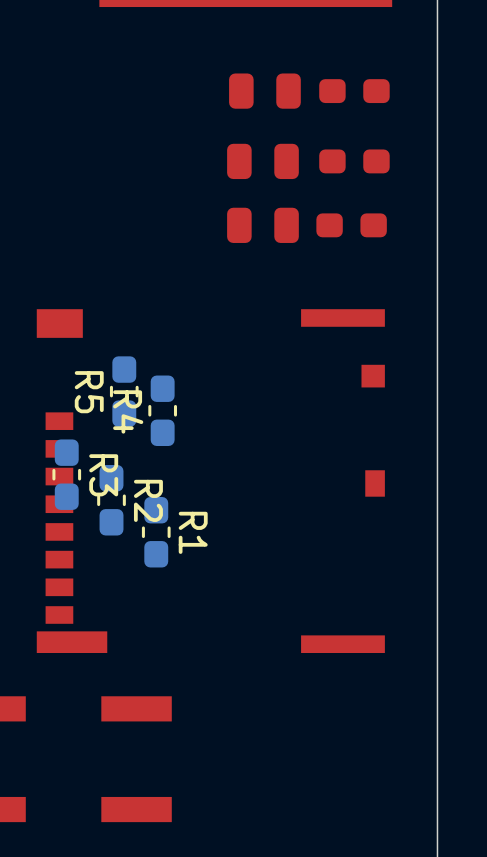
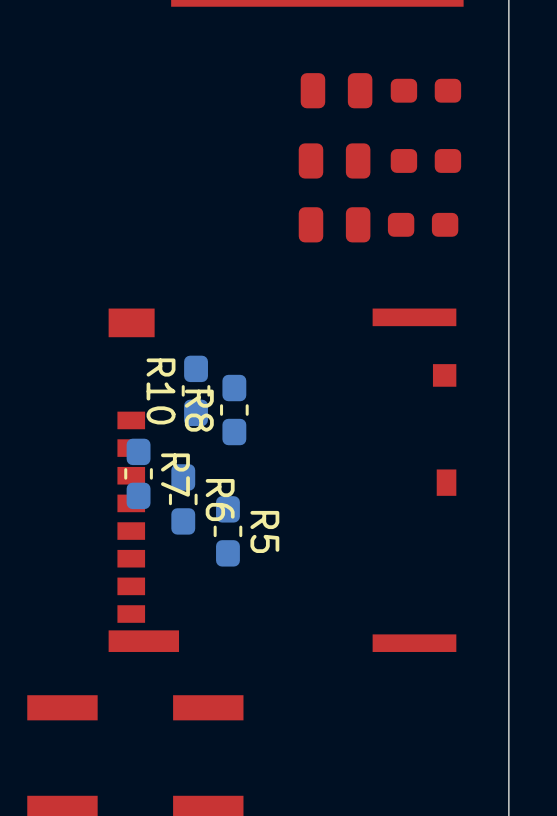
R5 name: R5 (89, 392) -> R10 (161, 391)
R4 name: R4 (128, 411) -> R8 (199, 410)
R3 name: R3 (103, 475) -> R7 (175, 475)
R2 name: R2 (148, 500) -> R6 (220, 500)
R1 name: R1 (193, 532) -> R5 (264, 531)

